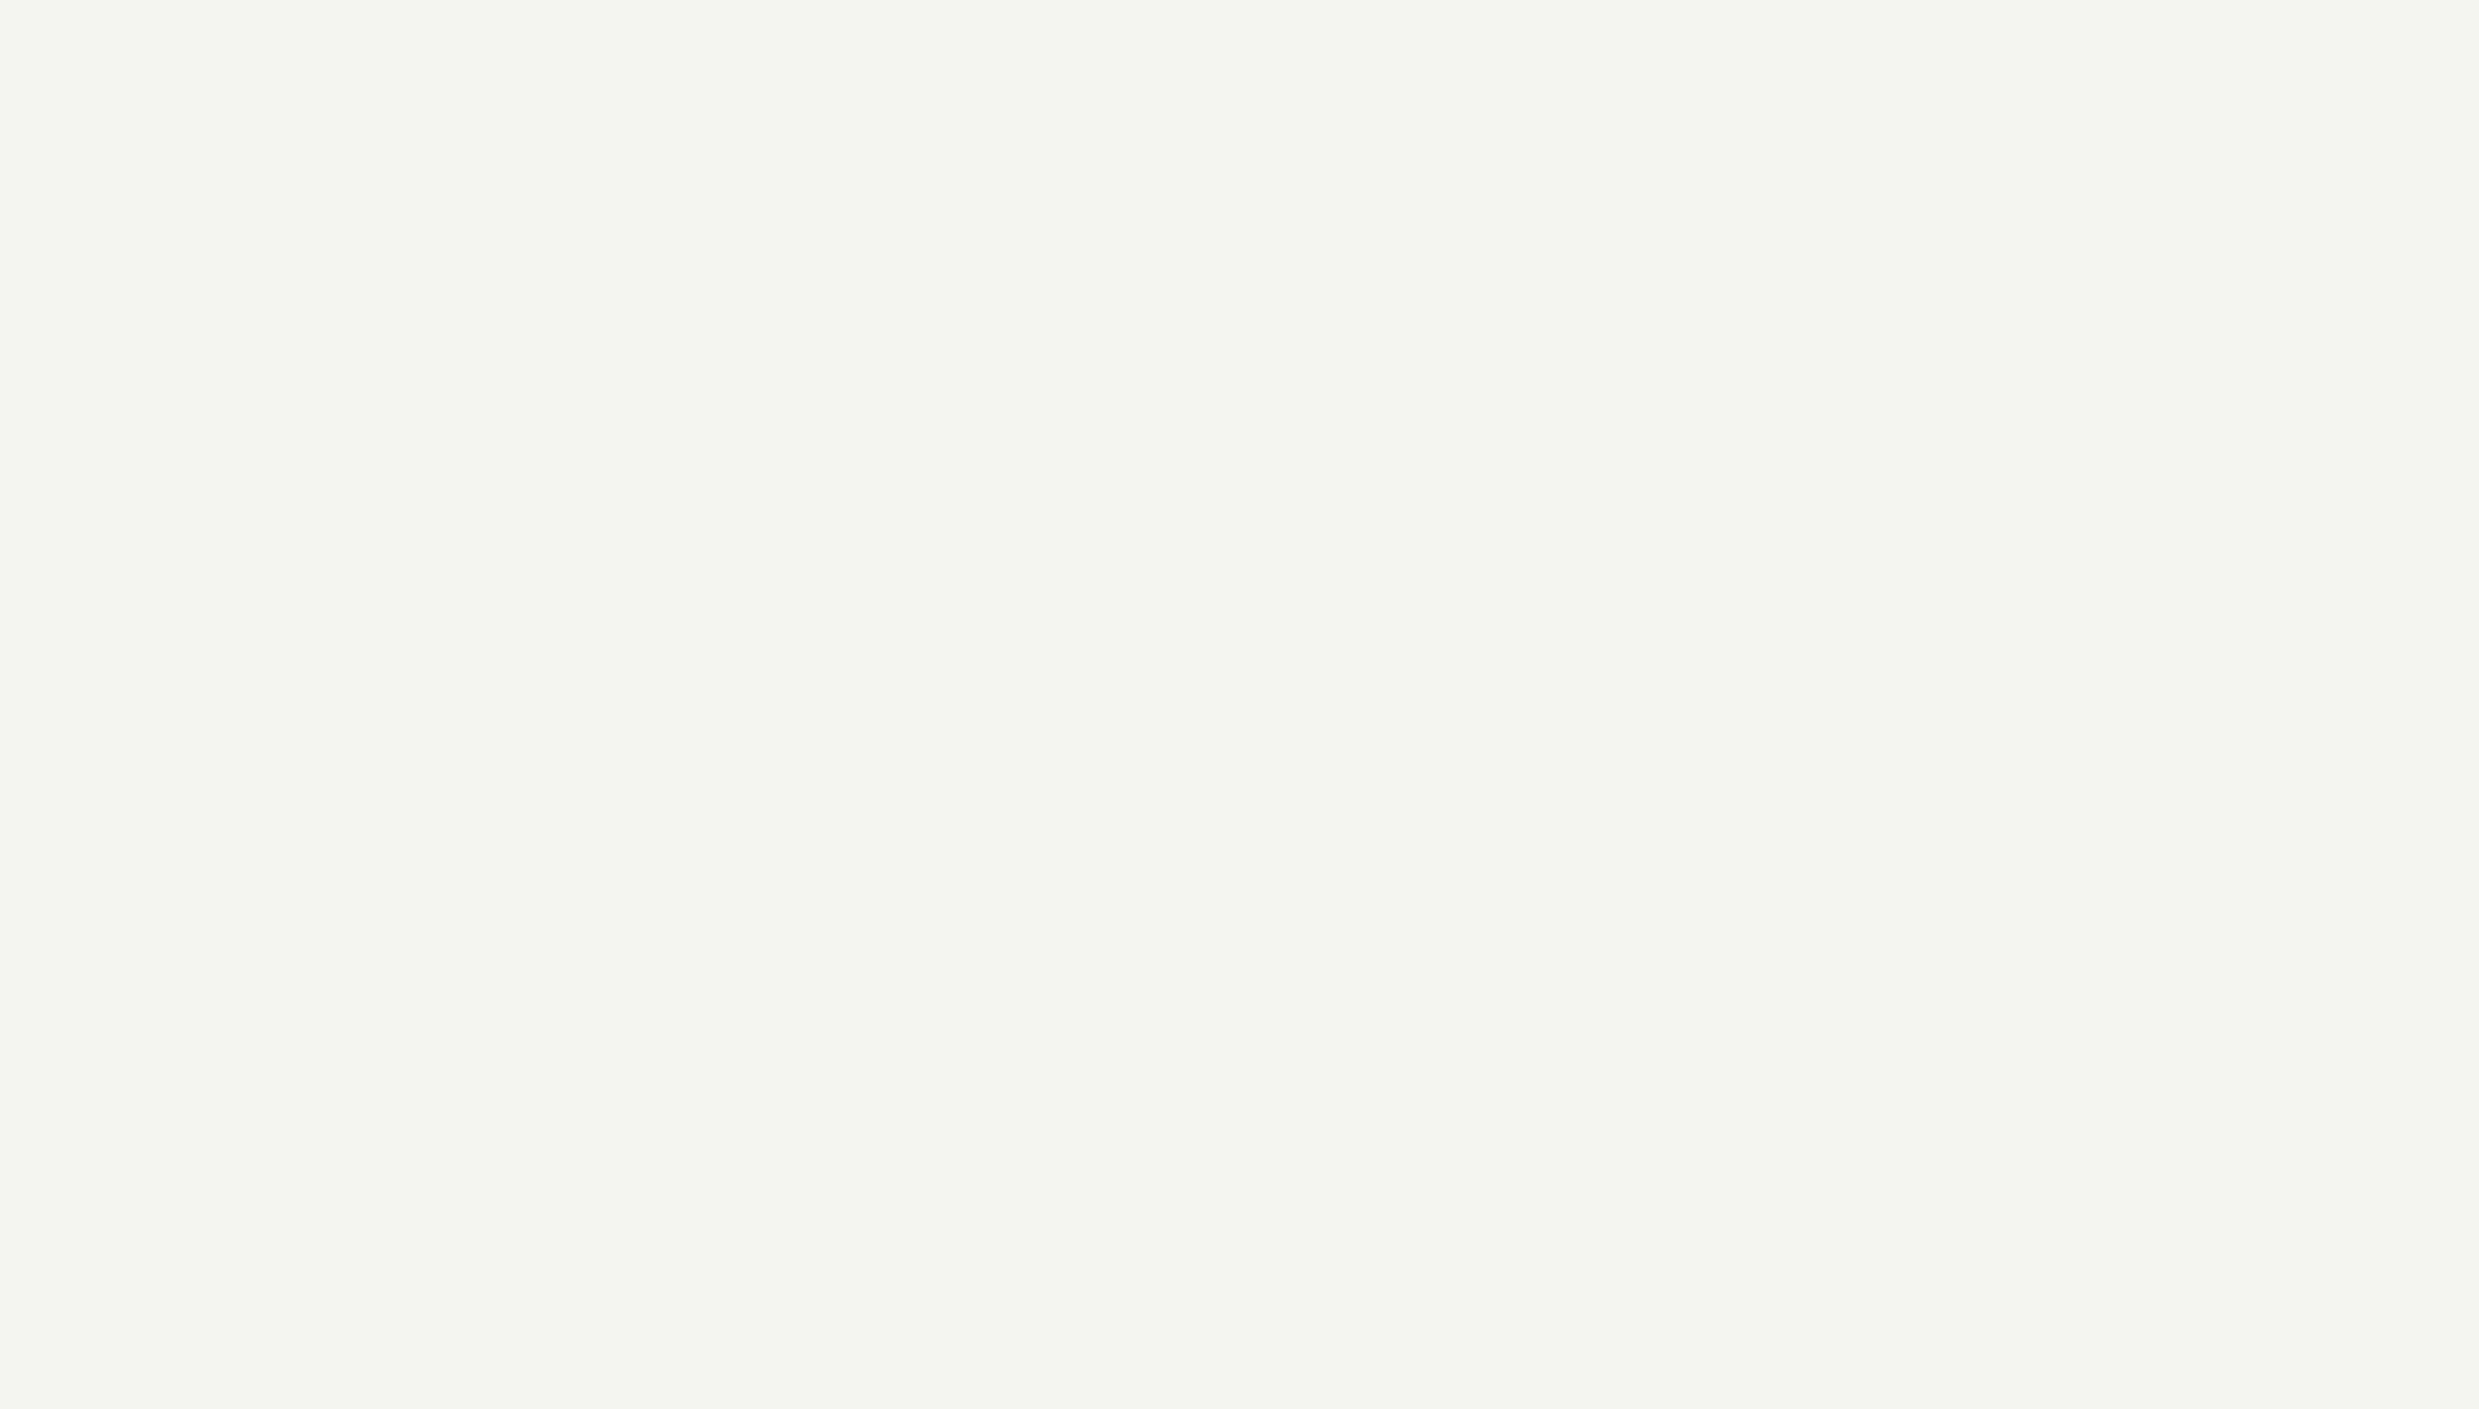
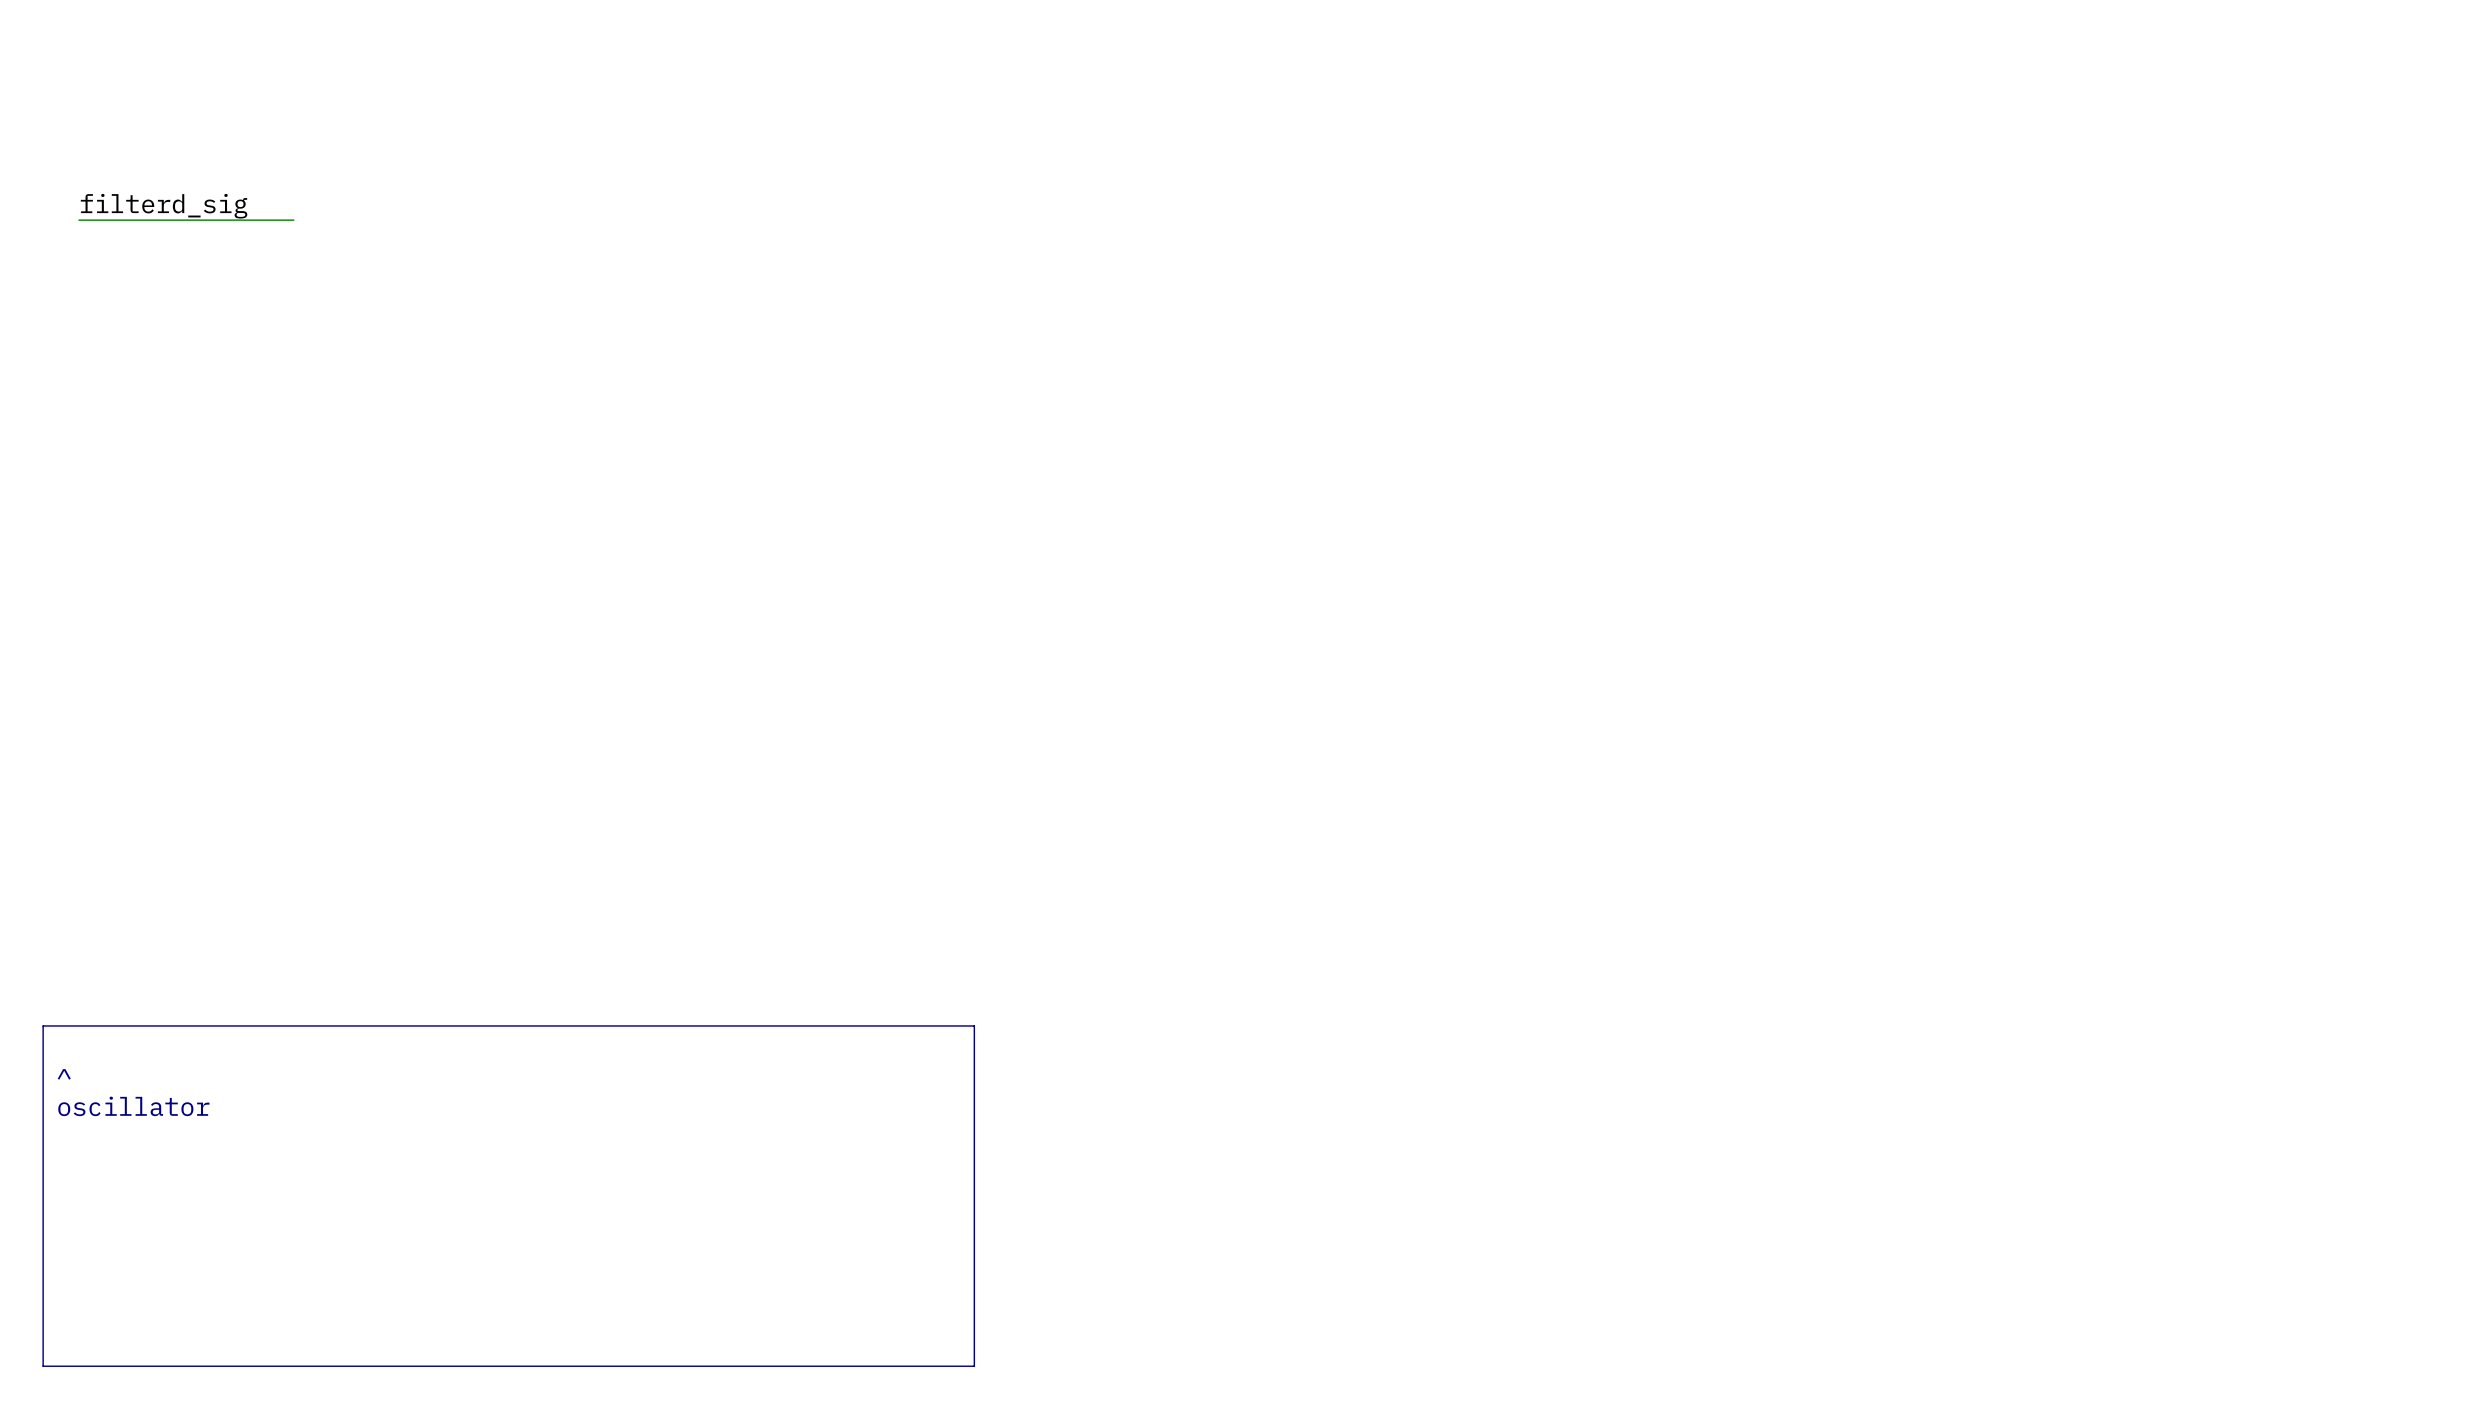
label: none -> filterd_sig (164, 206)
wire: none -> (78, 220) (293, 220)
line: none -> (43, 1025) (974, 1025) (974, 1366) (43, 1366) (43, 1025)
text: none -> ^ (64, 1074)
text: none -> oscillator (133, 1106)

